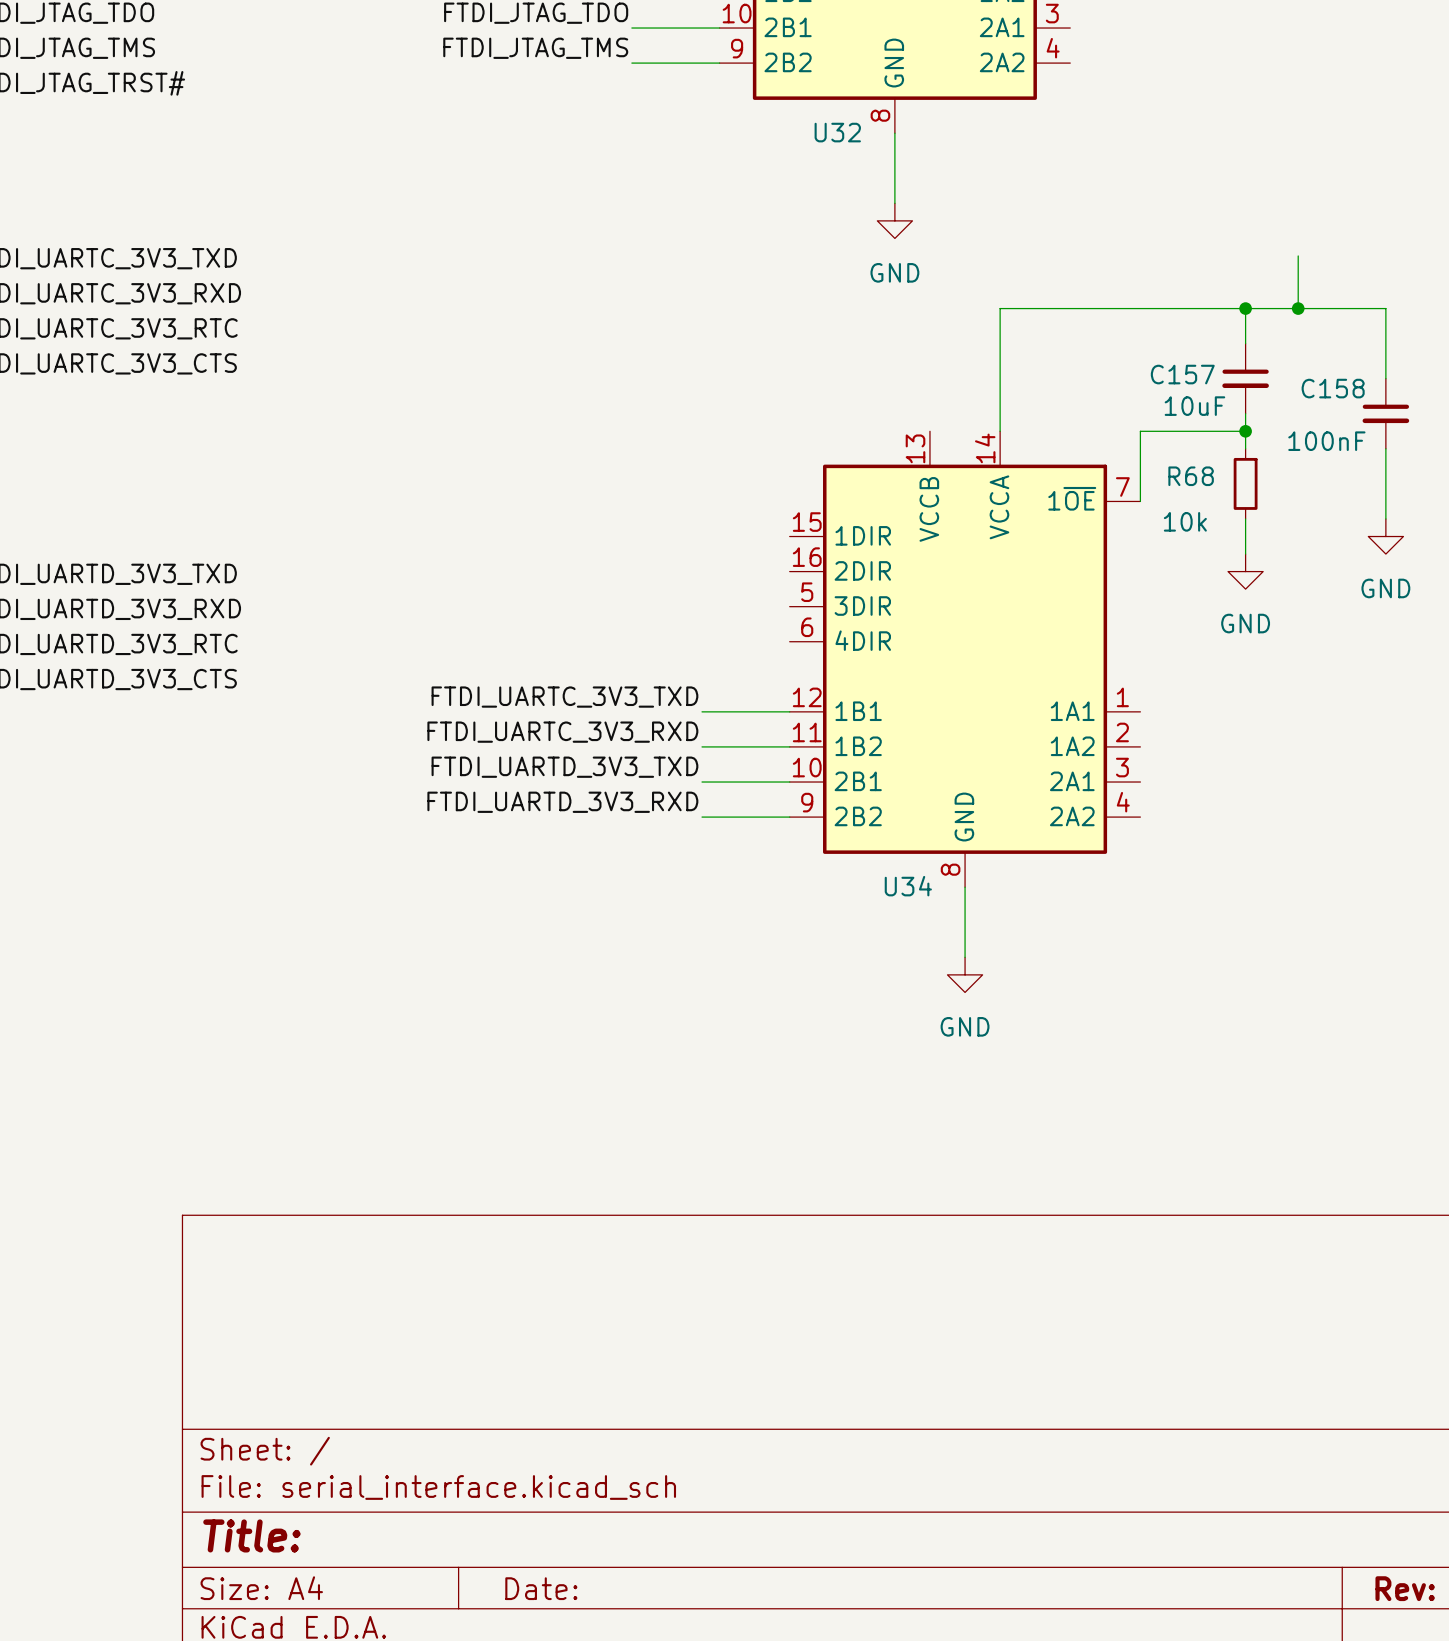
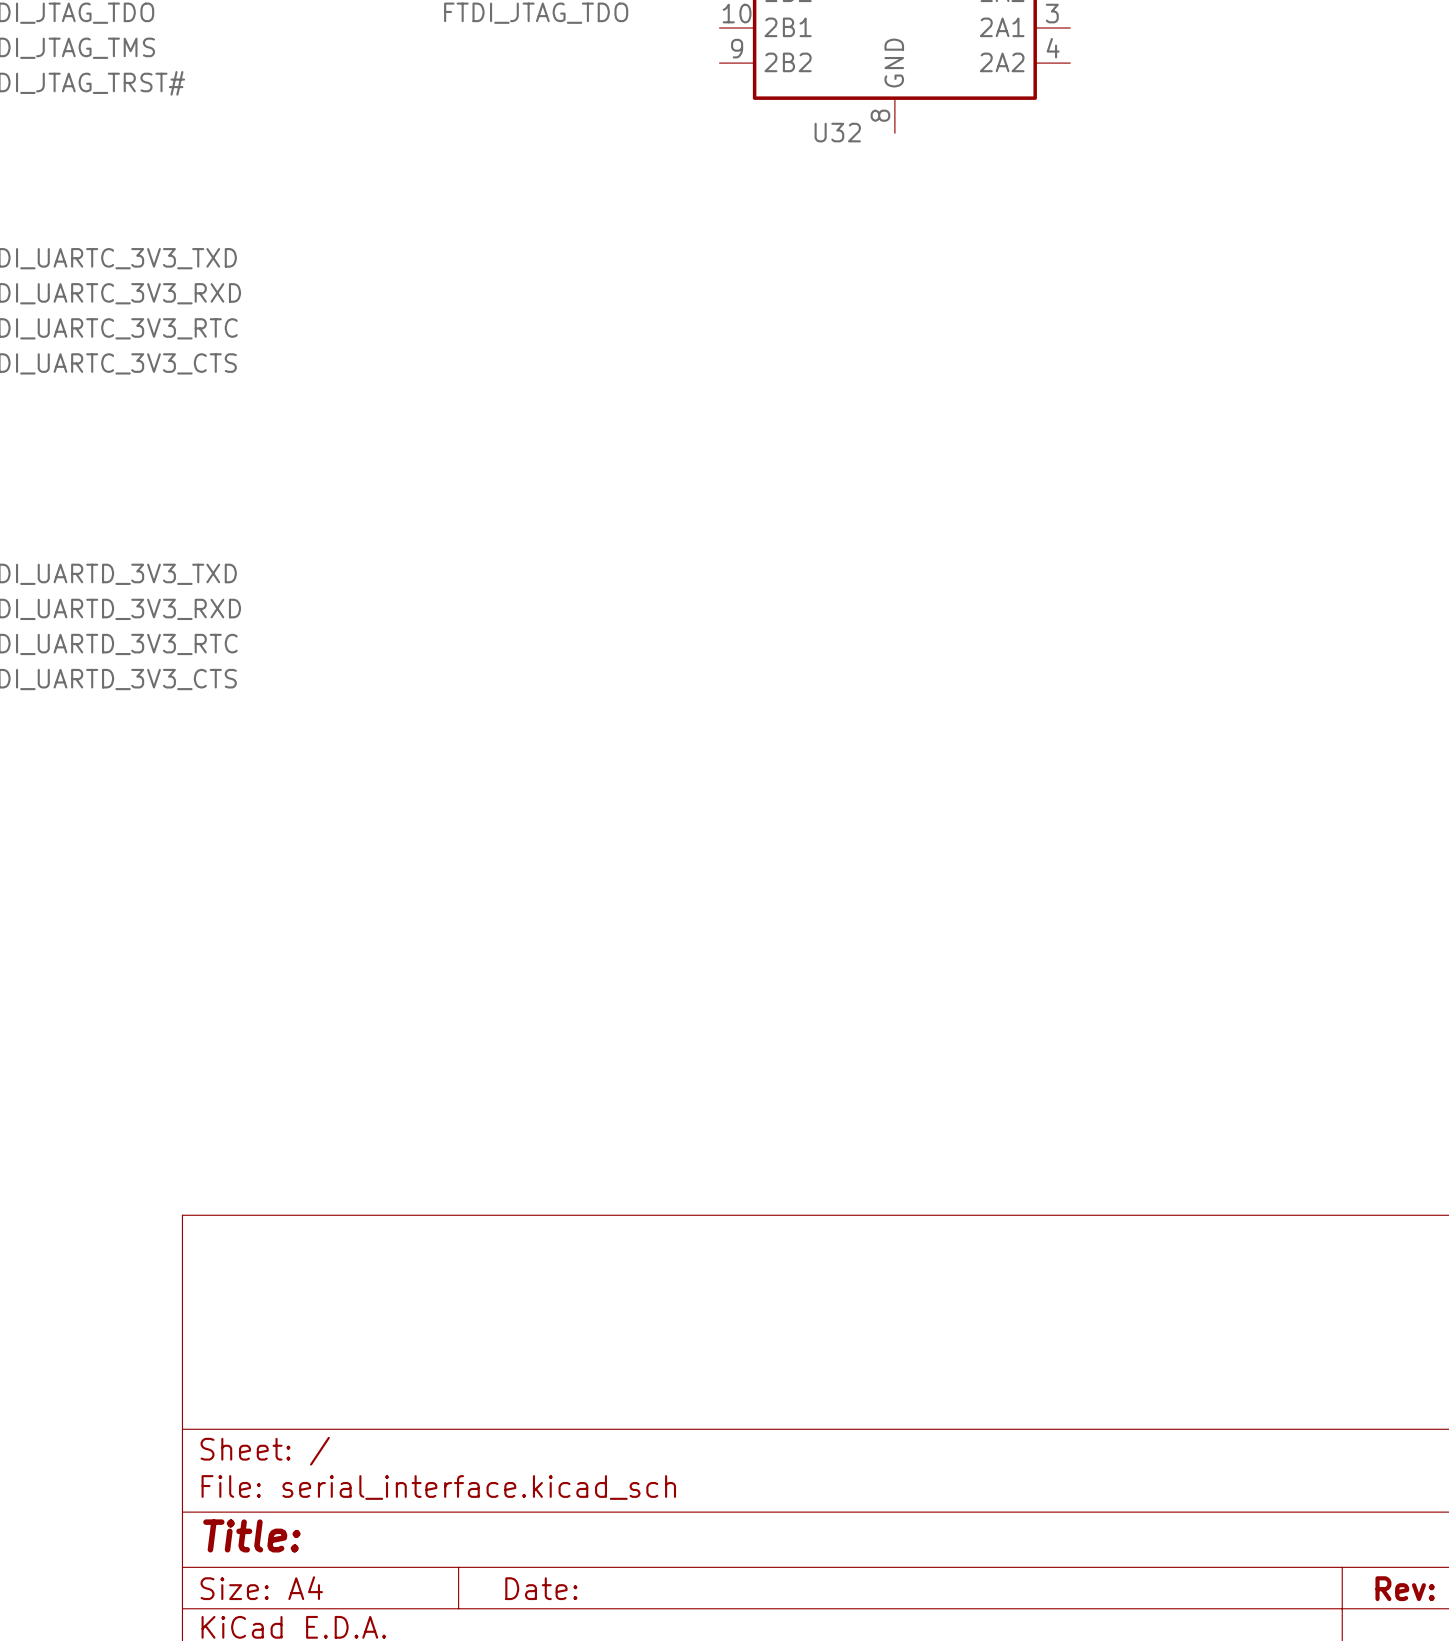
wire: (631, 28) (719, 28) -> none
label: FTDI_JTAG_TMS (535, 48) -> none
wire: (631, 63) (719, 63) -> none
wire: (894, 133) (894, 203) -> none
power symbol: GND (894, 220) -> none
wire: (1298, 255) (1298, 308) -> none
wire: (1245, 308) (1245, 343) -> none
junction: (1245, 308) -> none
junction: (1298, 308) -> none
C157: 10uF (1245, 378) -> none
wire: (1385, 378) (1385, 308) (1000, 308) (1000, 431) -> none
wire: (1245, 413) (1245, 448) -> none
C158: 100nF (1385, 413) -> none
wire: (1245, 431) (1140, 431) (1140, 501) -> none
junction: (1245, 431) -> none
wire: (1385, 448) (1385, 518) -> none
R68: 10k (1245, 483) -> none
wire: (1245, 518) (1245, 554) -> none
power symbol: GND (1385, 536) -> none
power symbol: GND (1245, 571) -> none
U34: (965, 659) -> none
label: FTDI_UARTC_3V3_TXD (564, 697) -> none
wire: (702, 711) (789, 711) -> none
label: FTDI_UARTC_3V3_RXD (562, 732) -> none
wire: (702, 746) (789, 746) -> none
label: FTDI_UARTD_3V3_TXD (564, 767) -> none
wire: (702, 782) (789, 782) -> none
label: FTDI_UARTD_3V3_RXD (562, 802) -> none
wire: (702, 817) (789, 817) -> none
wire: (965, 887) (965, 957) -> none
power symbol: GND (965, 974) -> none

